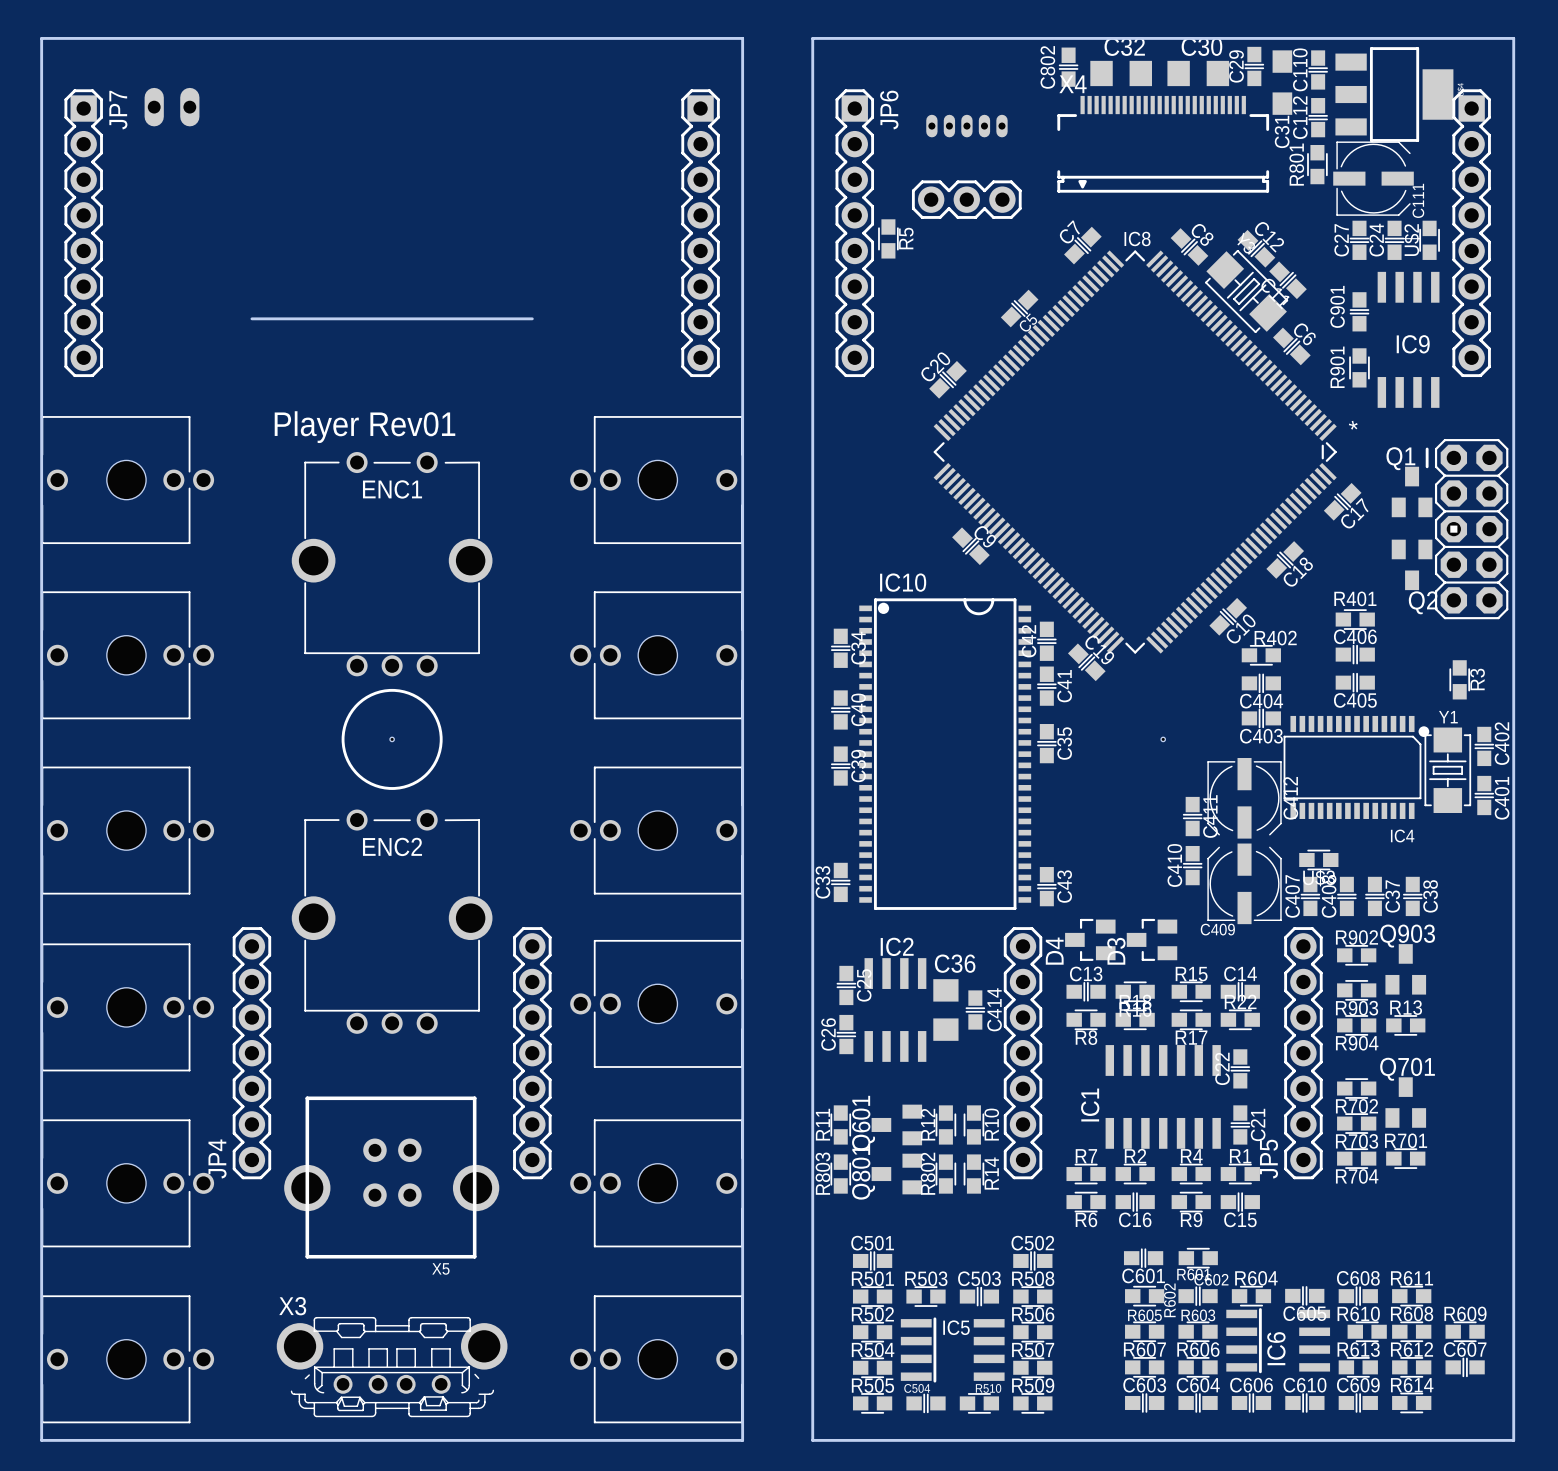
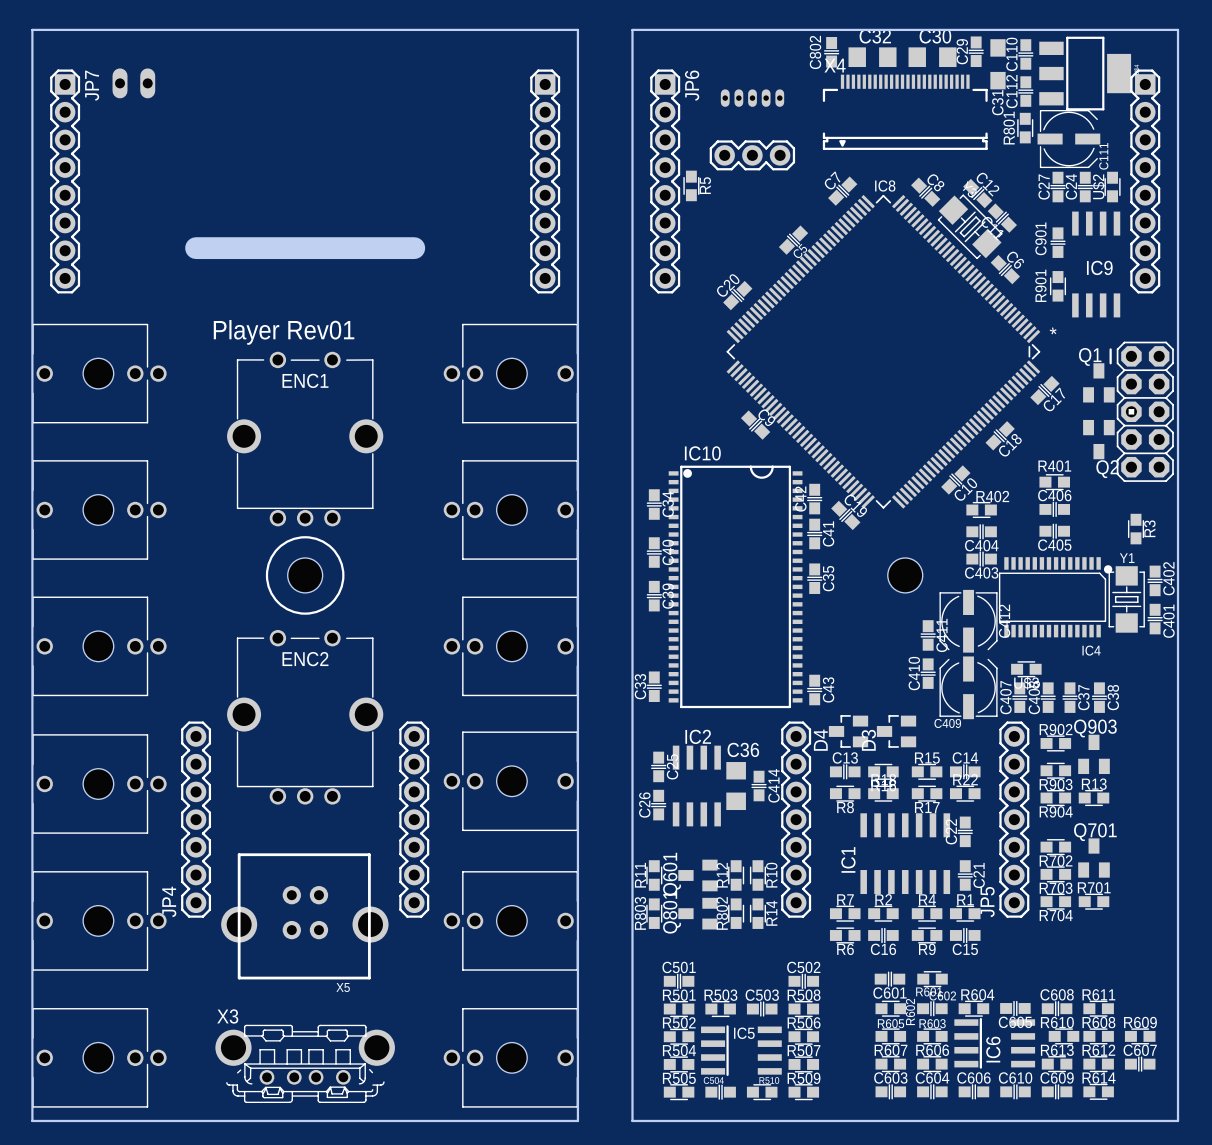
board edge width: thin (251, 318) (532, 318) -> thick (196, 248) (414, 248)
hole size: [389, 737, 395, 742] -> [287, 557, 323, 593]
hole size: [1161, 737, 1166, 742] -> [887, 557, 923, 593]

